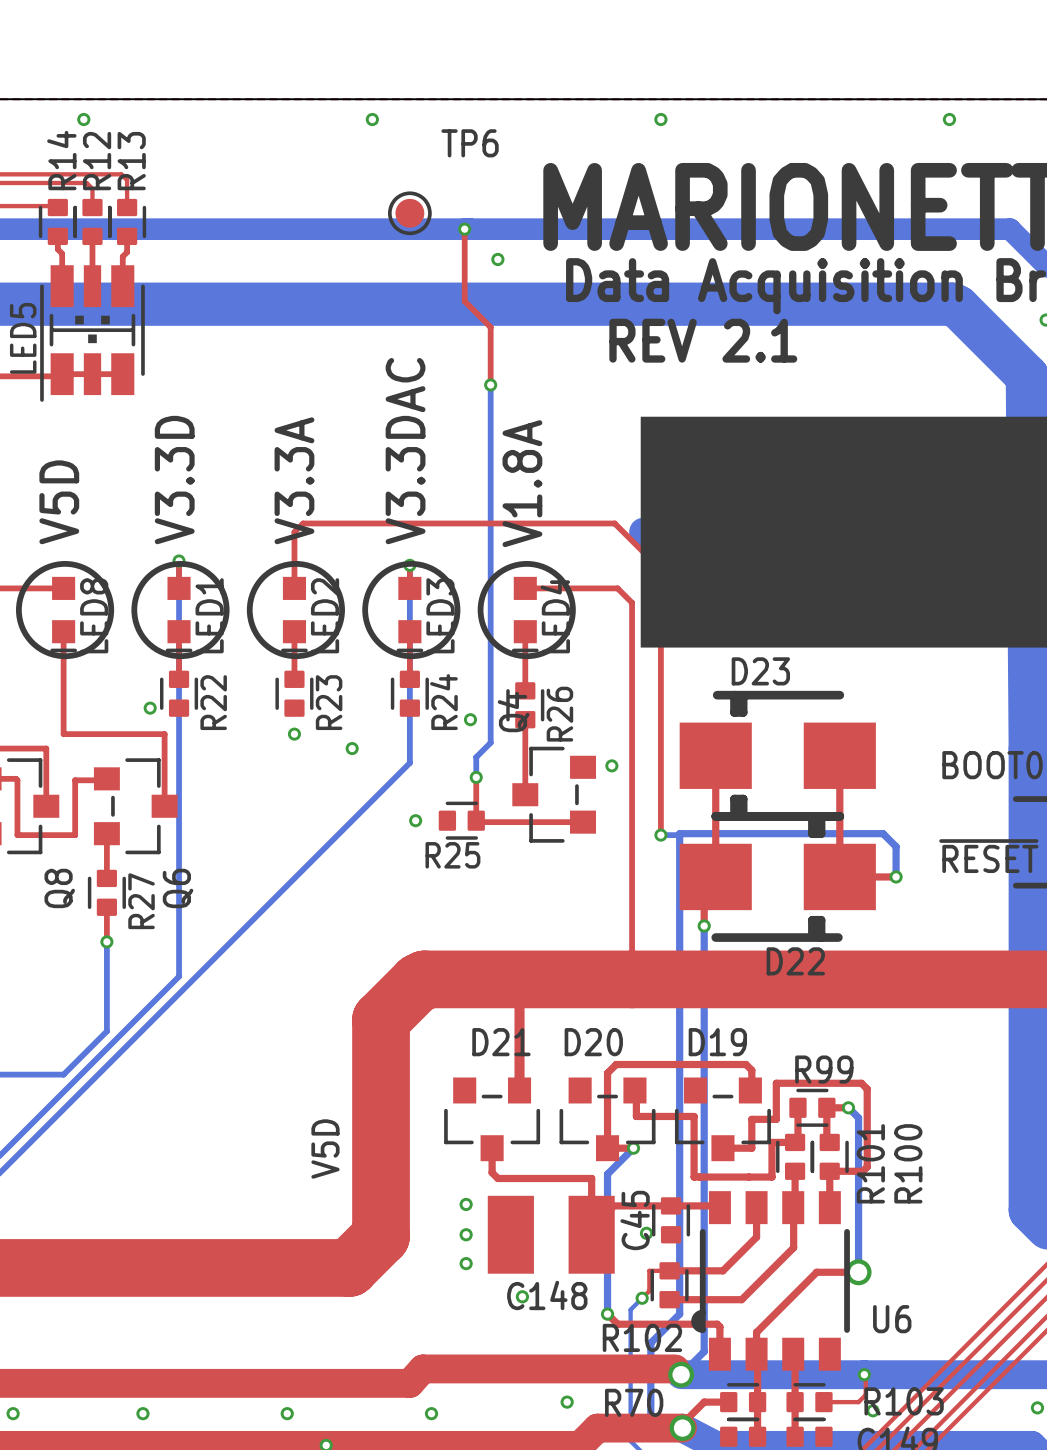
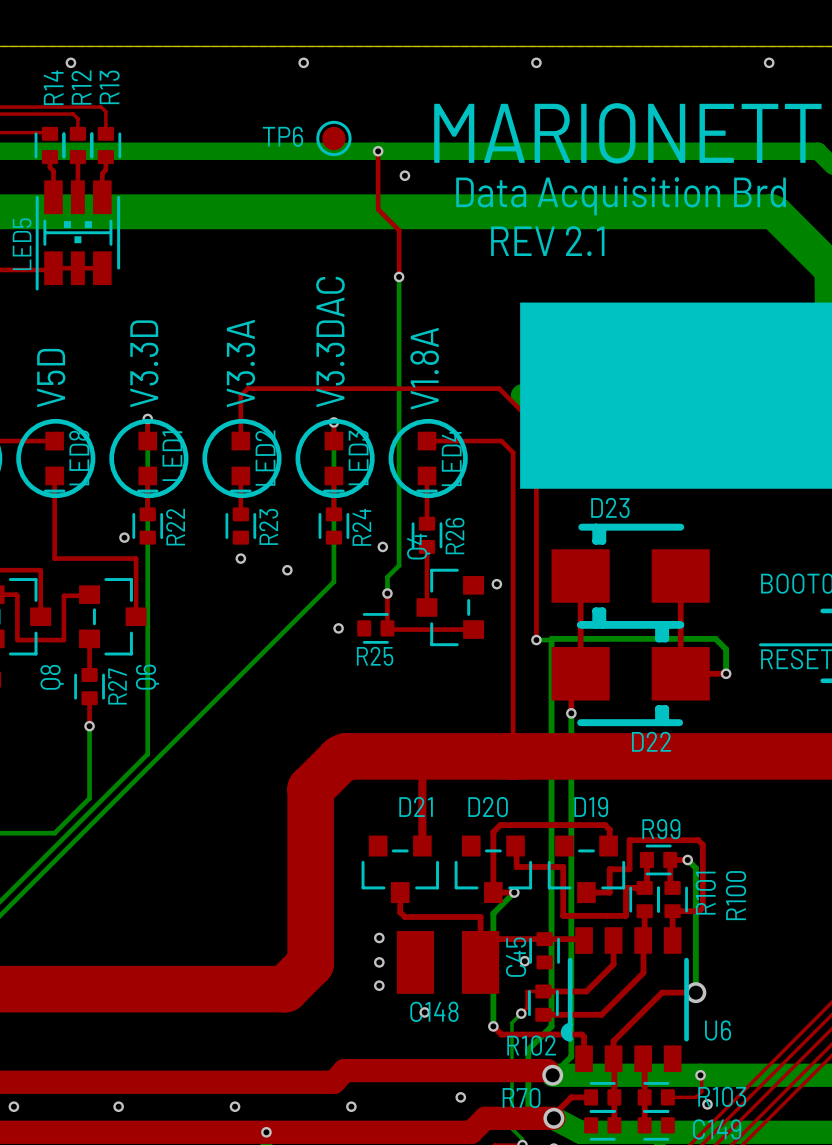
TP6 name position: TP6 (470, 143) -> TP6 (283, 136)
text: V5D (325, 1149) -> none

